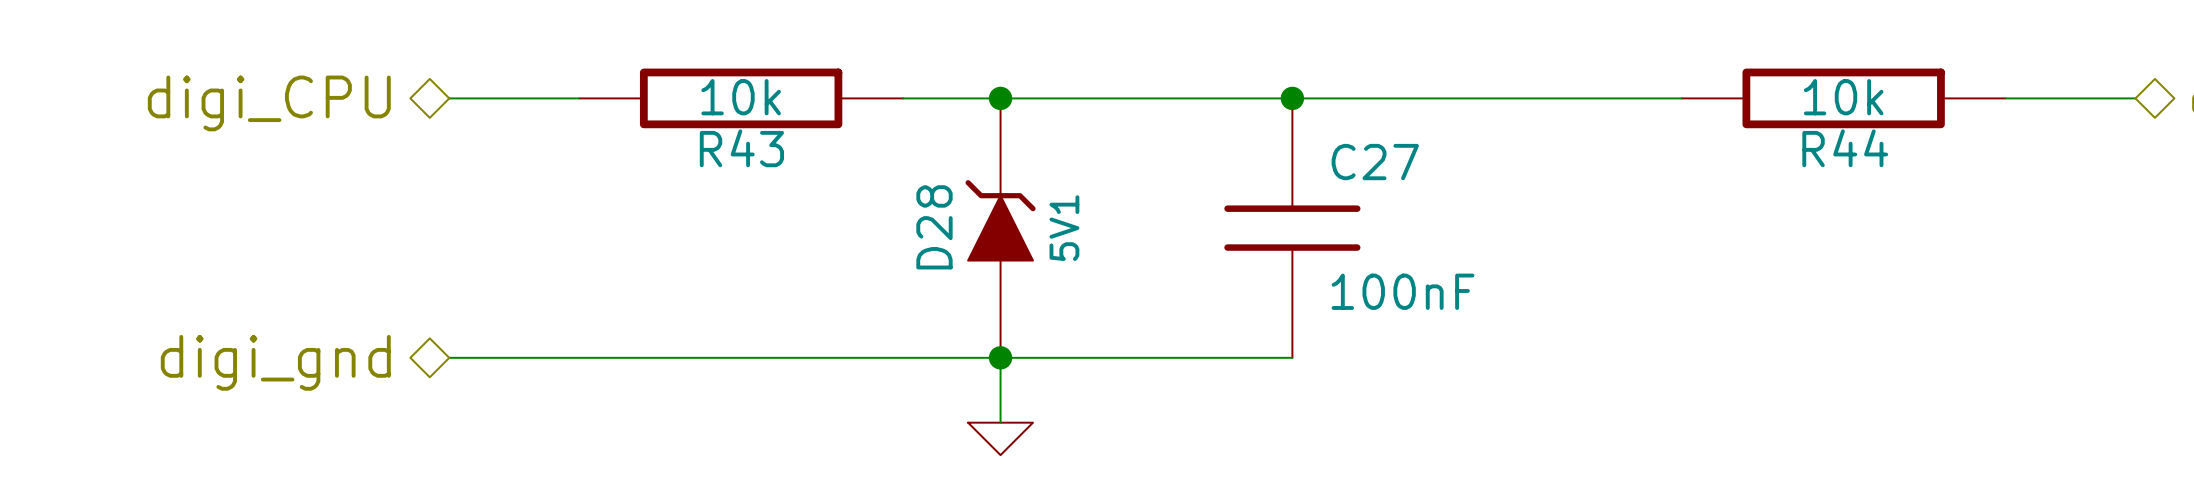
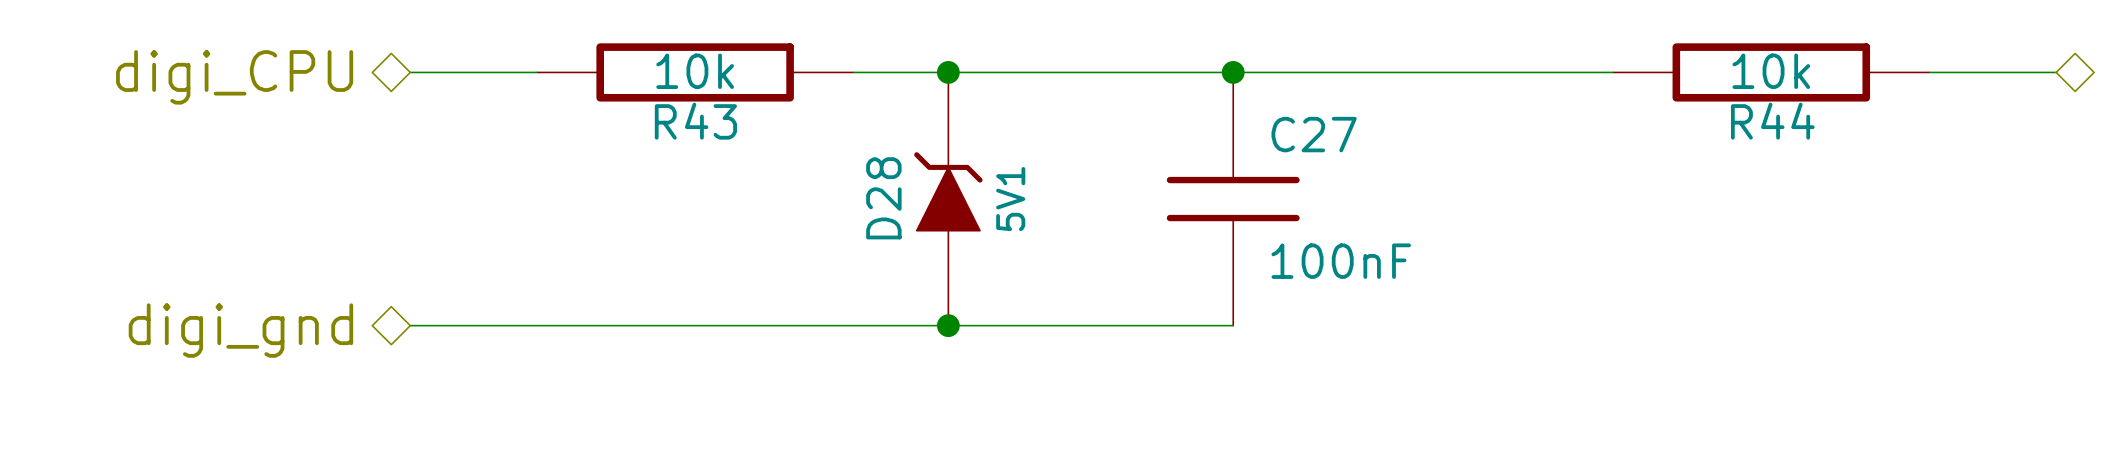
wire: (1000, 357) (1000, 422) -> none
power symbol: (1000, 438) -> none

